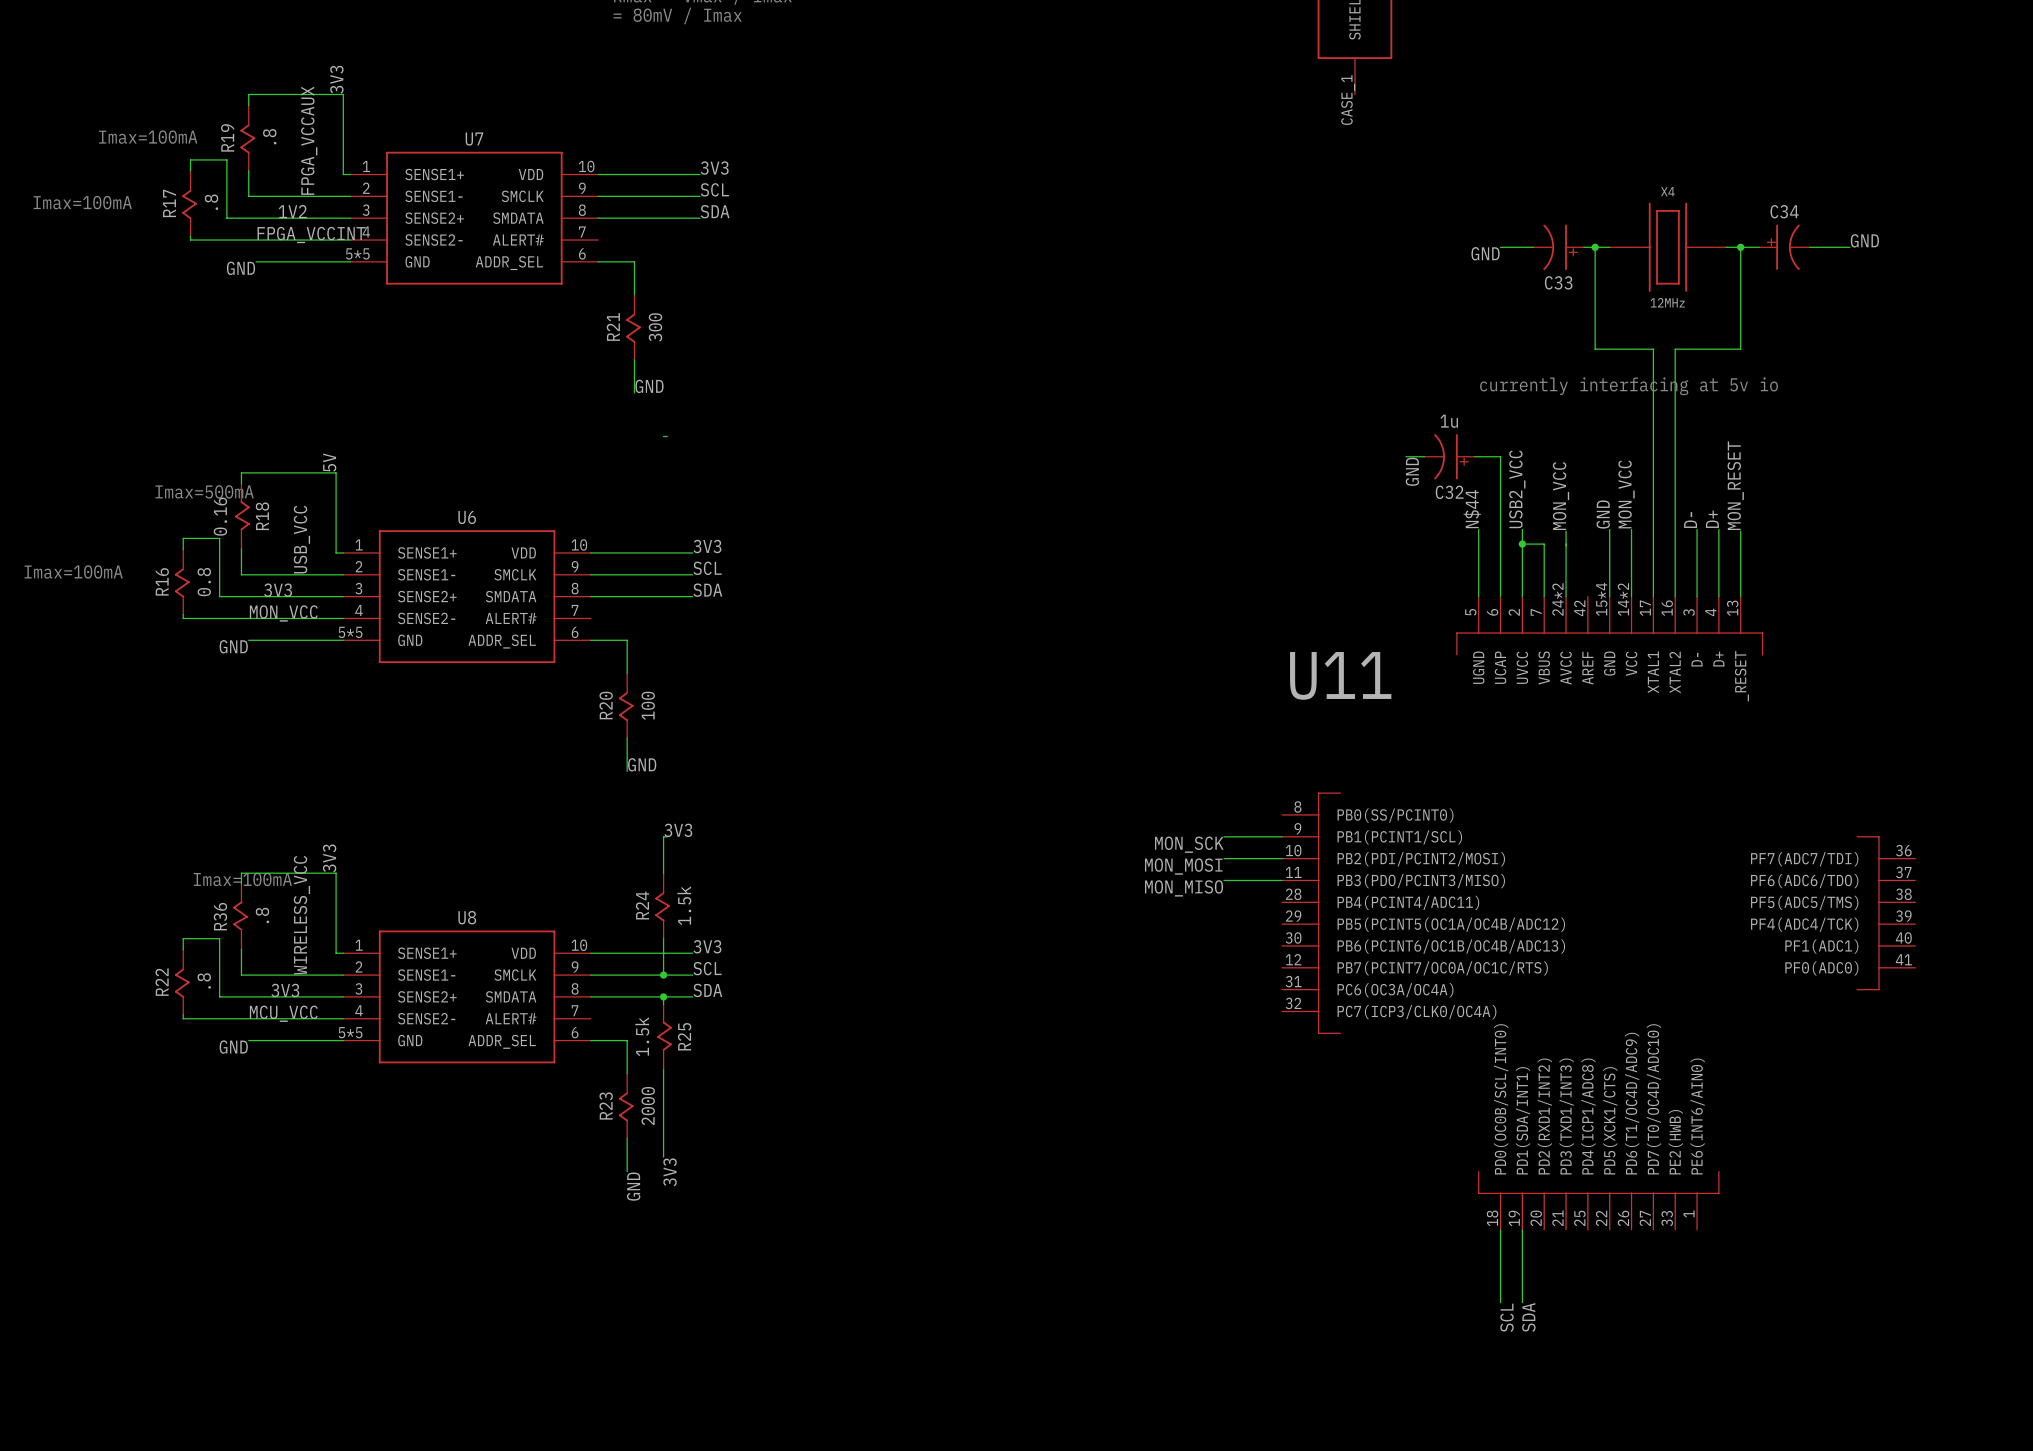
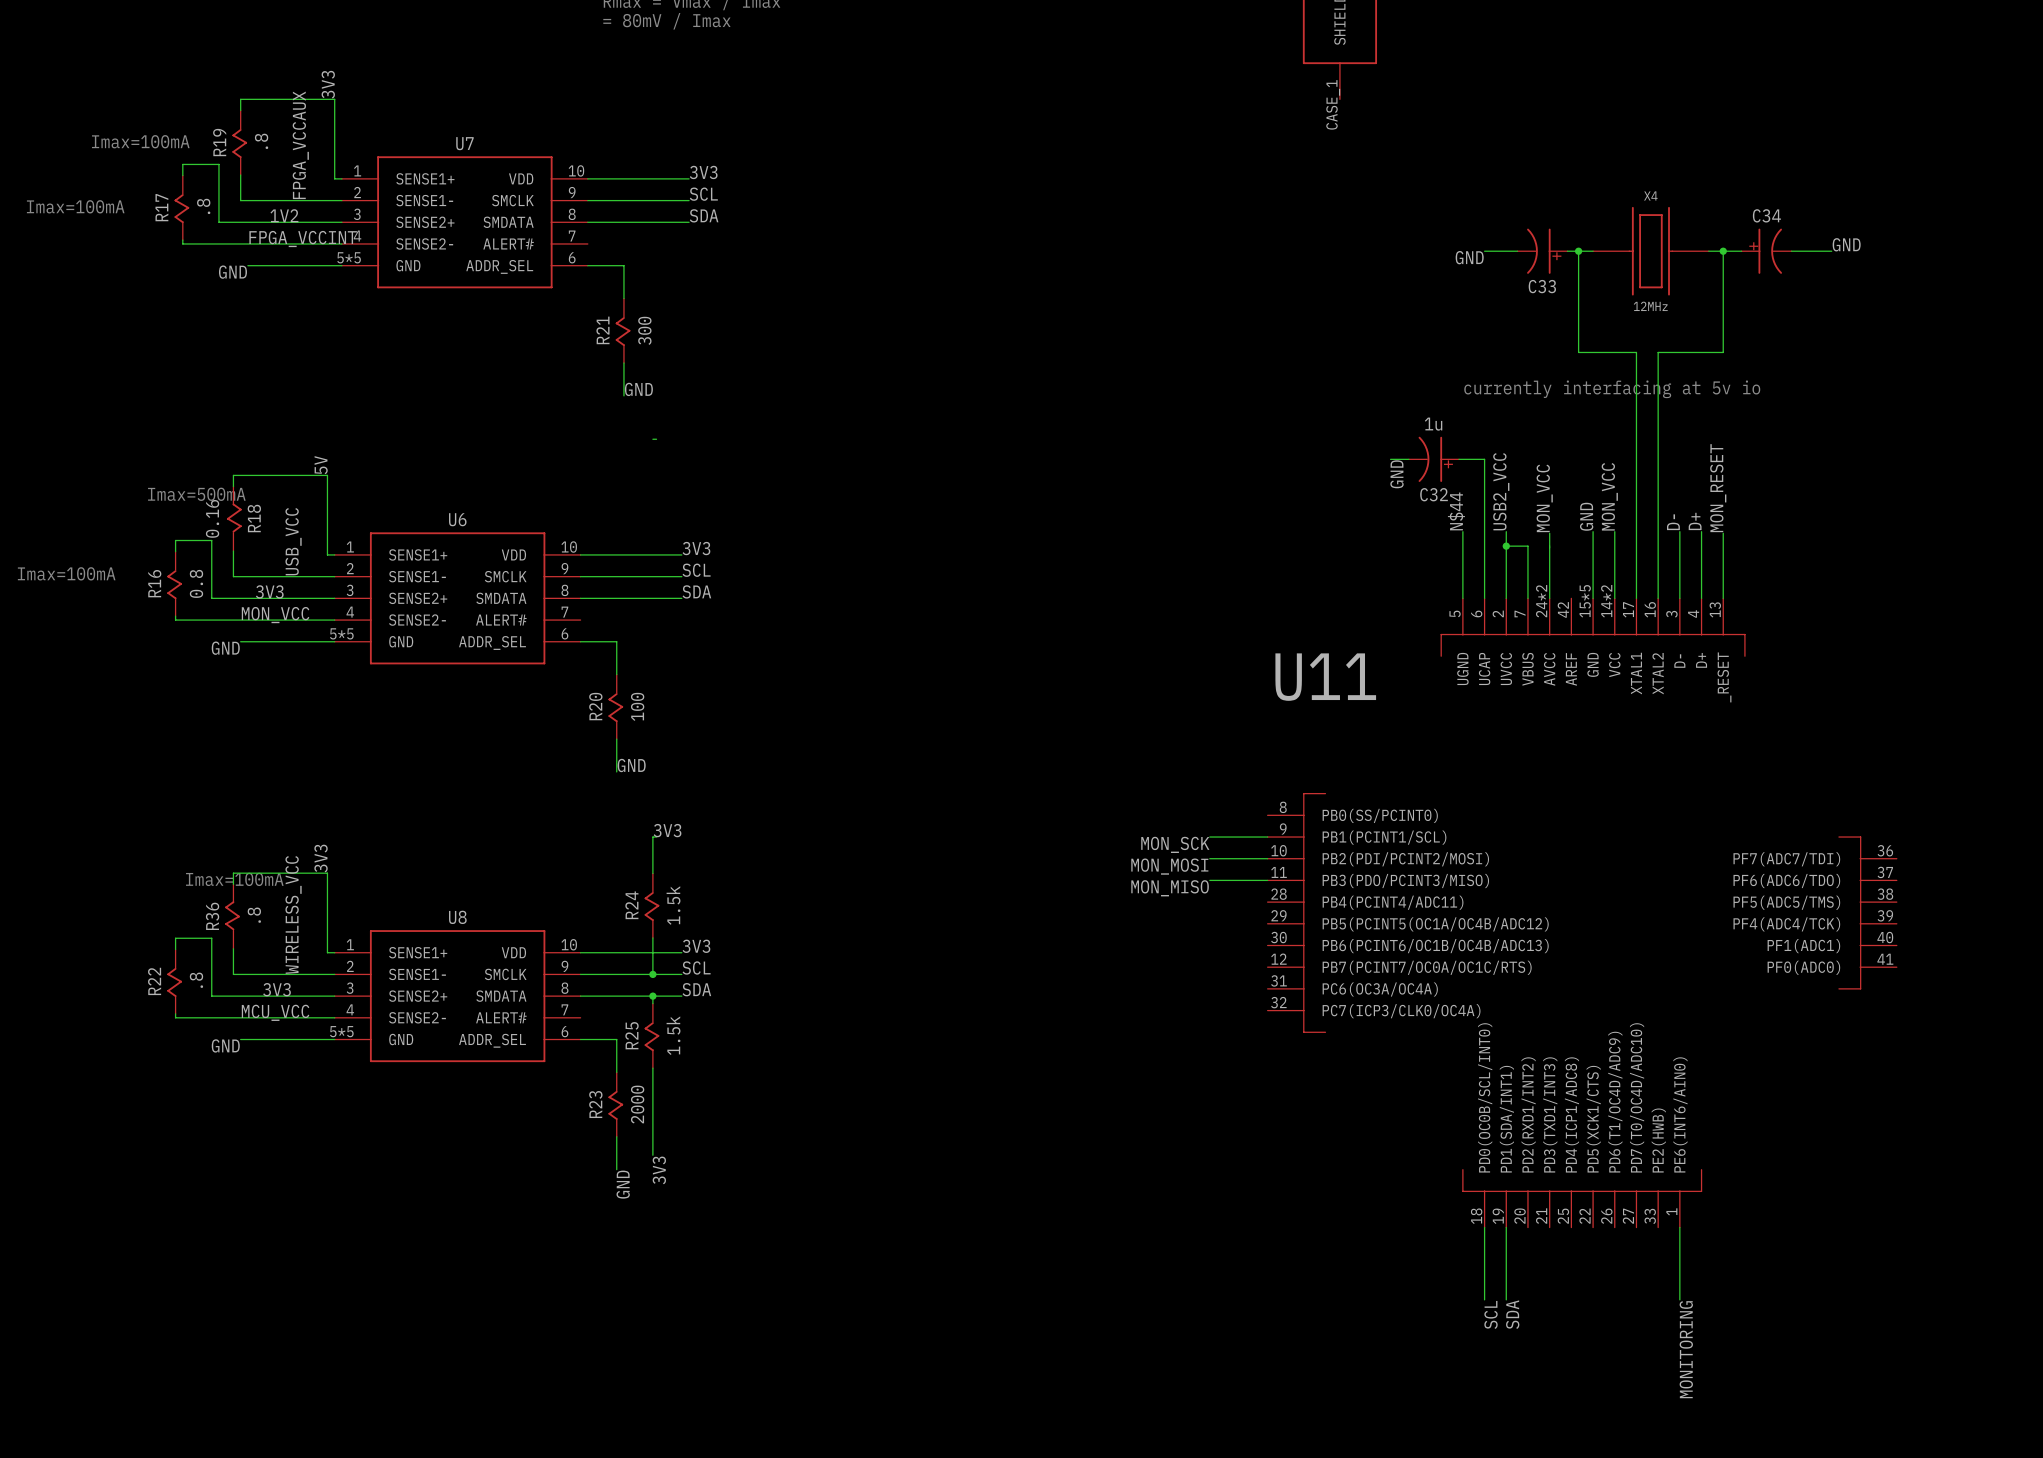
U11 pin number: 15*4 (1601, 599) -> 15*5 (1585, 601)
R25 rotation: 0° (664, 1036) -> 180° (651, 1036)
wire: none -> (1679, 1227) (1679, 1299)
label: none -> MONITORING (1686, 1349)

